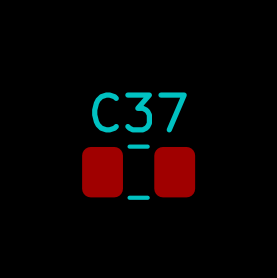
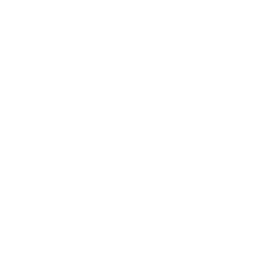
C37: (138, 172) -> none

